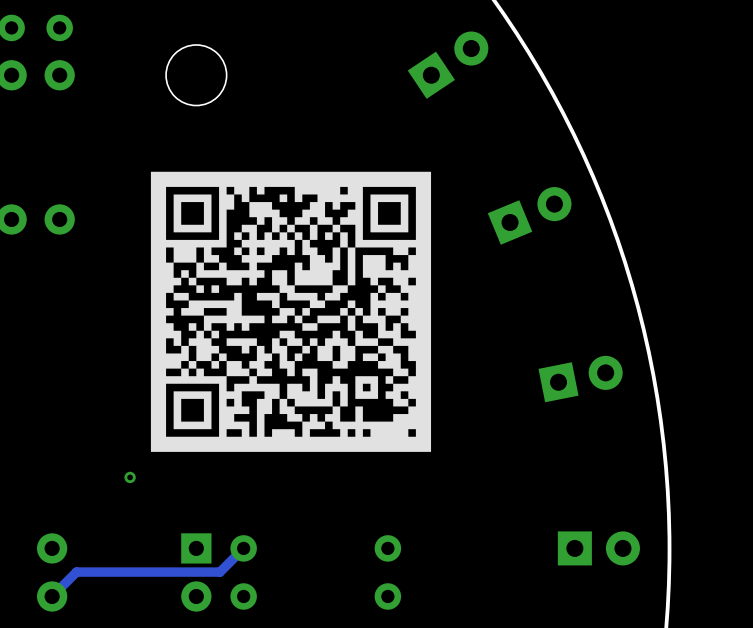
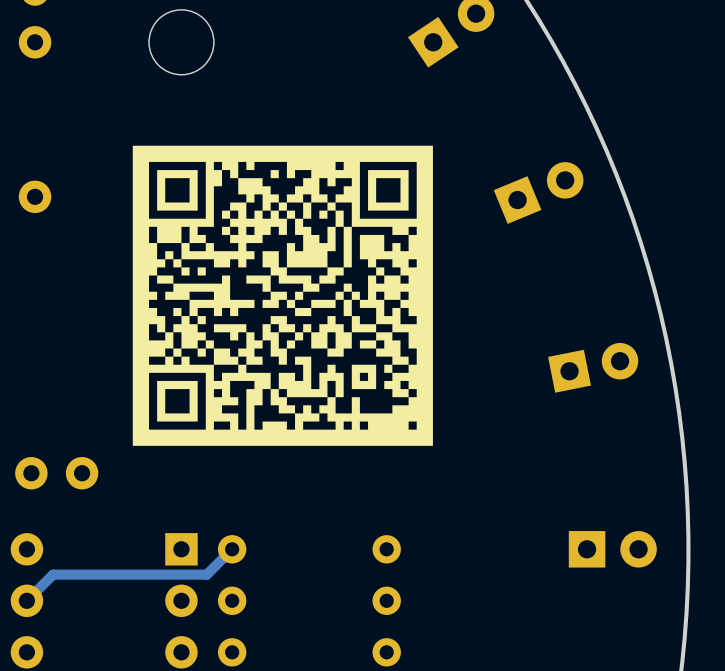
part: none -> (56, 473)
via: (130, 477) -> none

